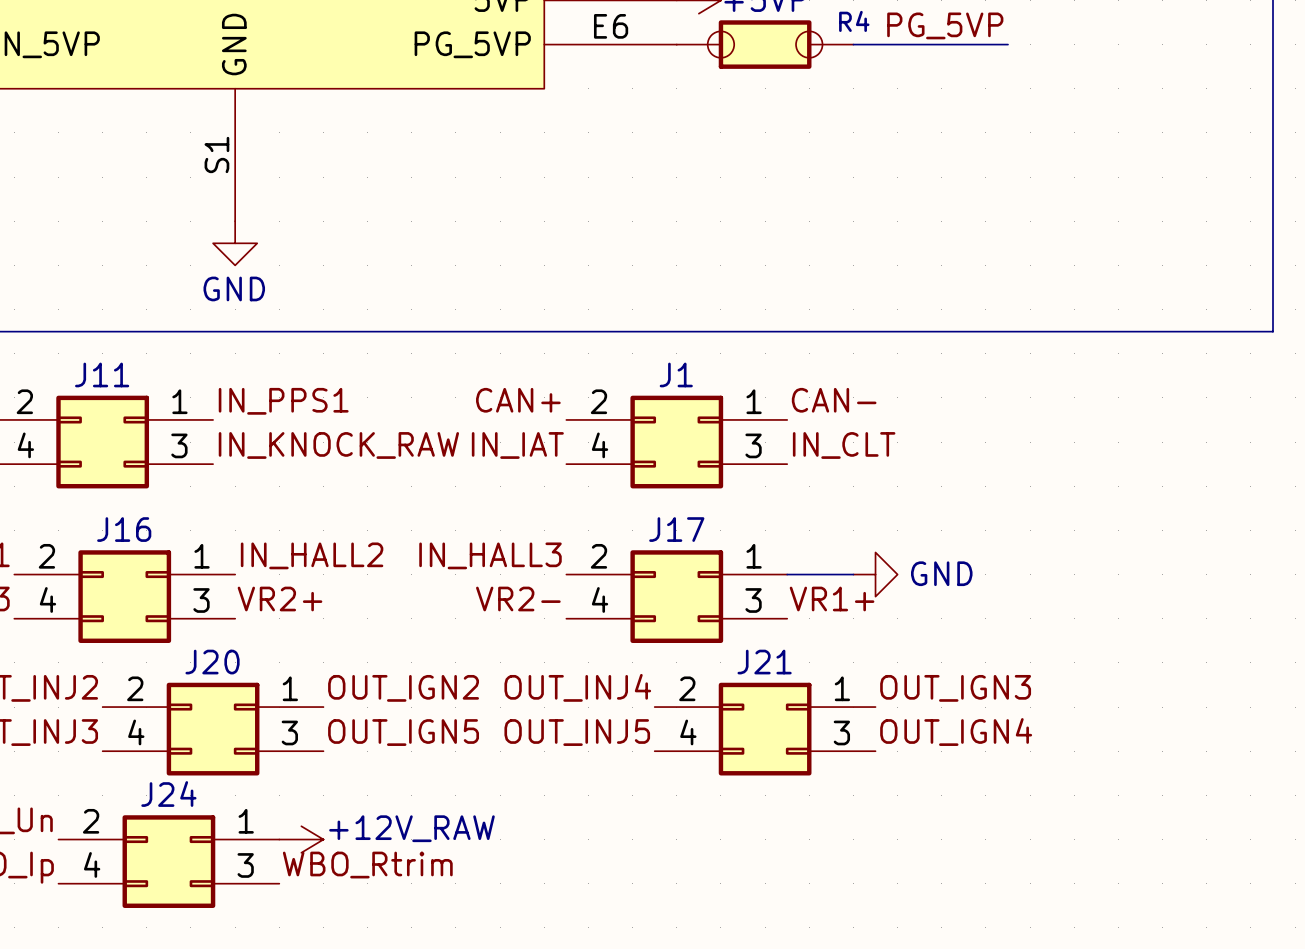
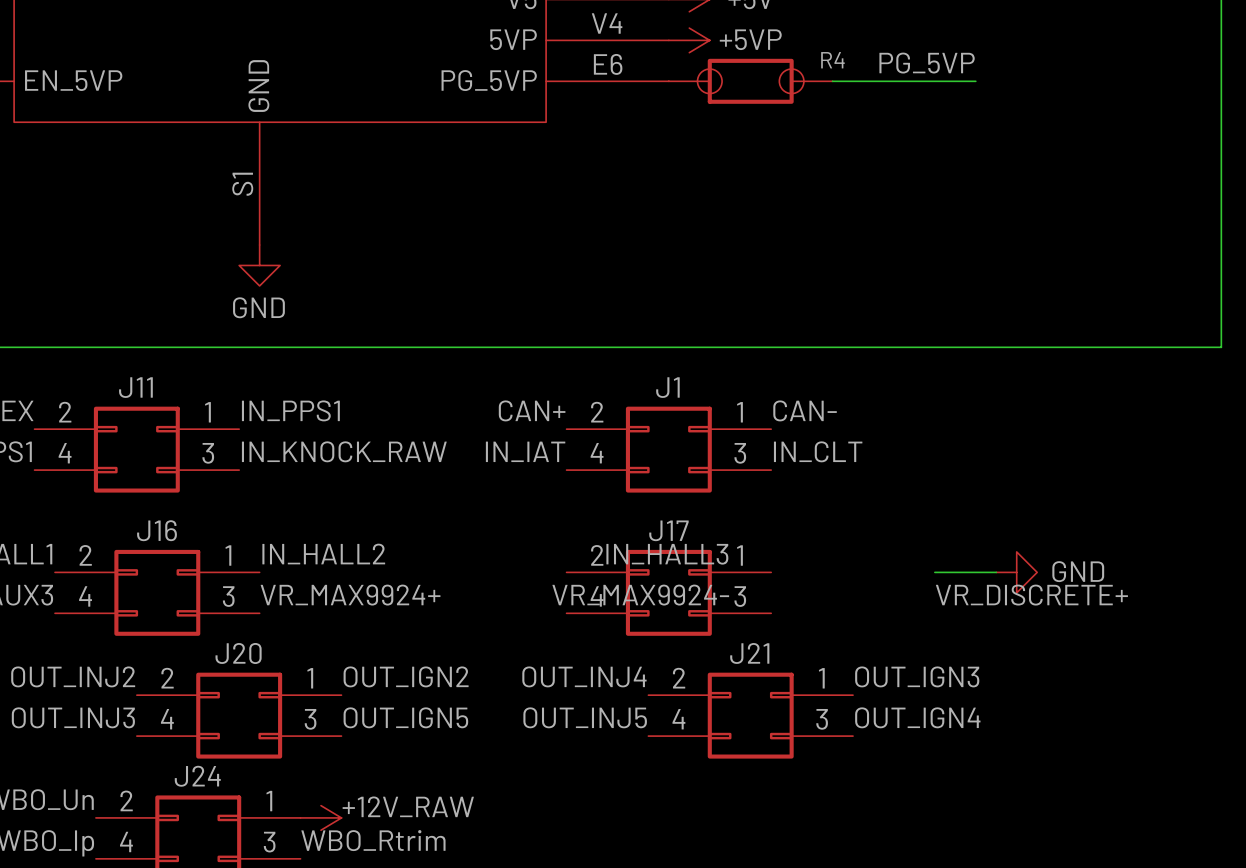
label position: IN_HALL3 (490, 555) -> IN_HALL3 (667, 554)
wire: (787, 574) (853, 574) -> (934, 572) (996, 572)
power symbol position: GND (875, 574) -> GND (1016, 572)
label: VR2+ (280, 599) -> VR_MAX9924+ (350, 595)
label: VR2- (518, 599) -> none
label: none -> VR_MAX9924- (640, 595)
label: VR1+ (832, 599) -> none
label: none -> VR_DISCRETE+ (1031, 595)

